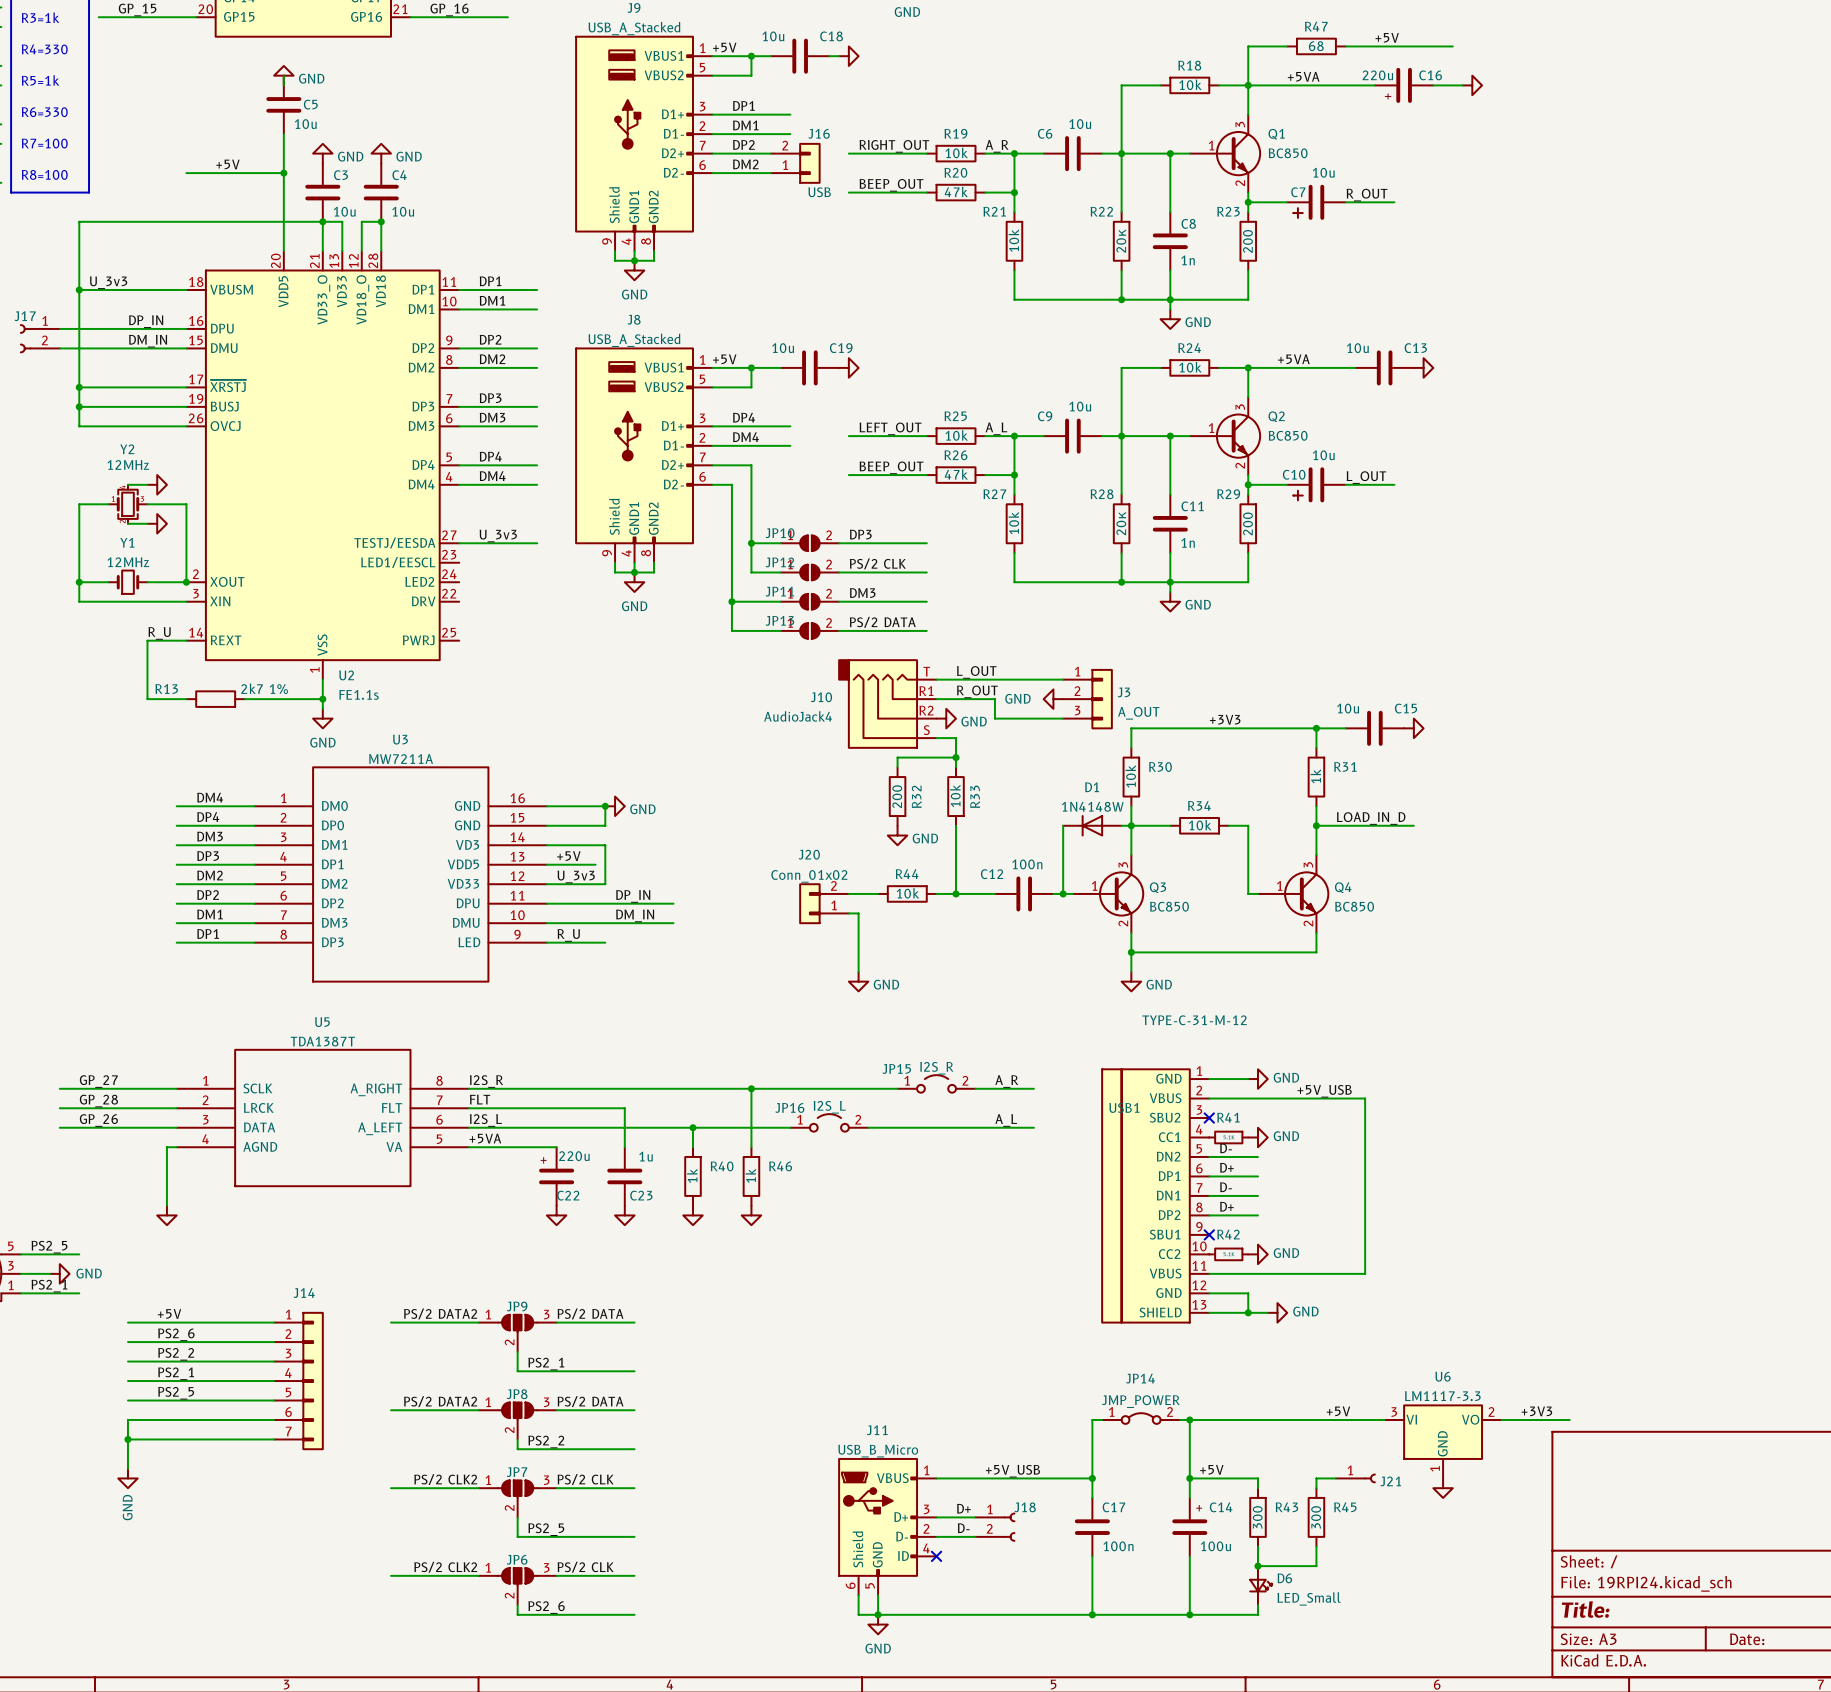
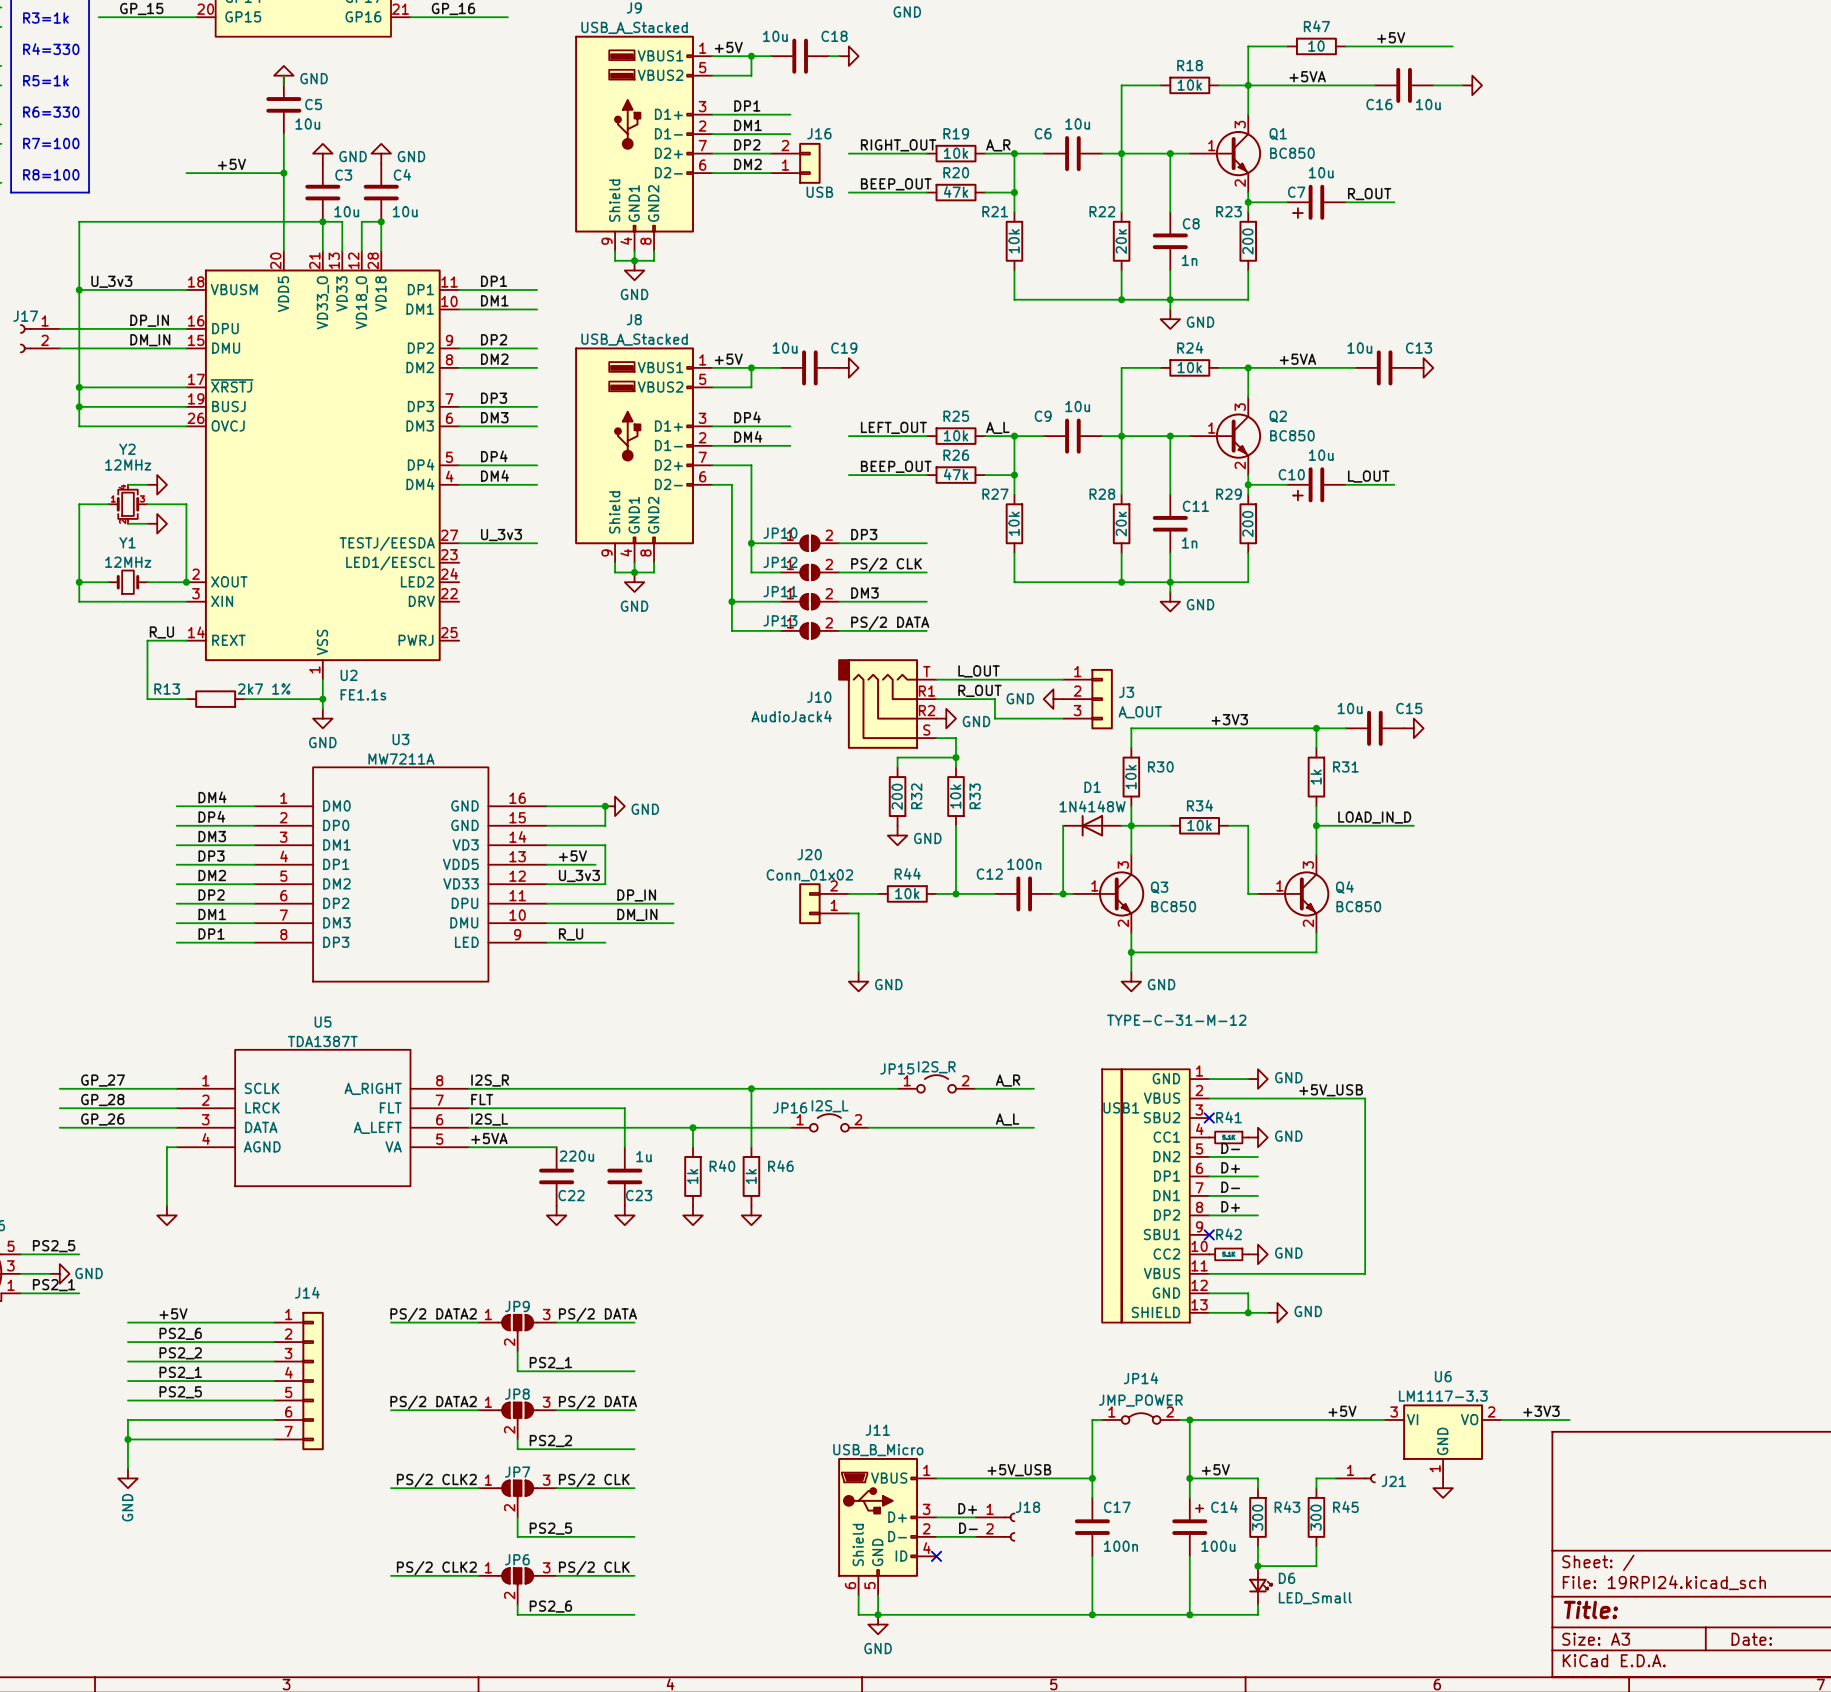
R47 value: 68 (1316, 46) -> 10 (1316, 46)
C16 value: 220u (1377, 75) -> 10u (1428, 104)
C16 name position: C16 (1430, 75) -> C16 (1379, 104)
C16 text: + (1388, 96) -> none
C22 text: + (543, 1160) -> none

